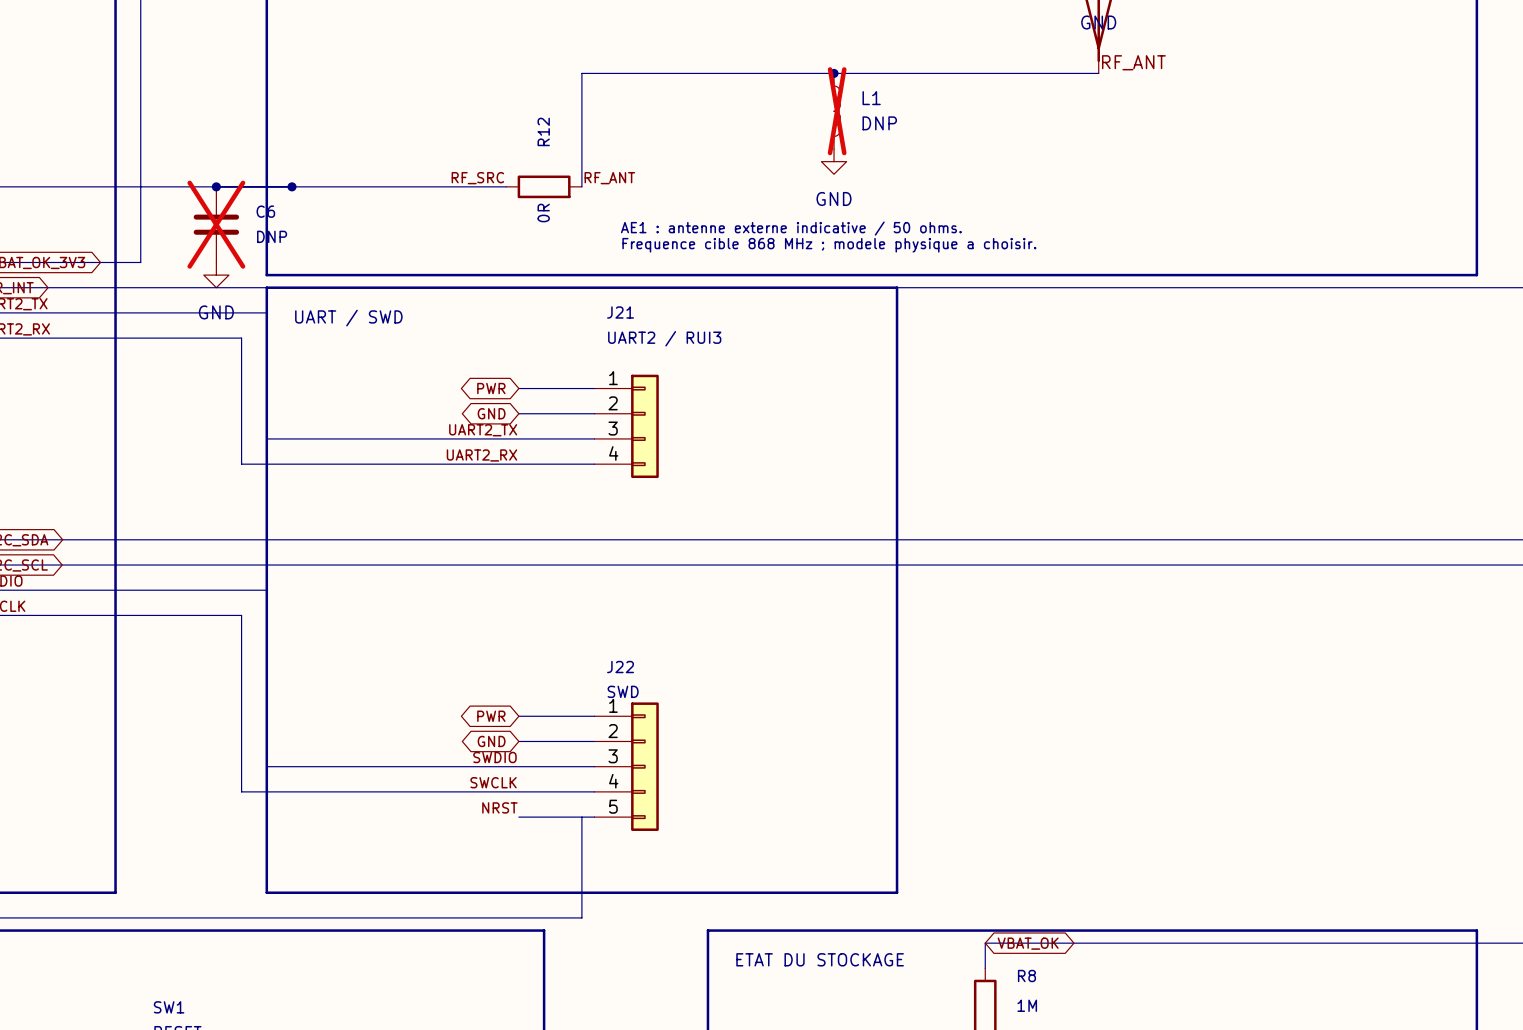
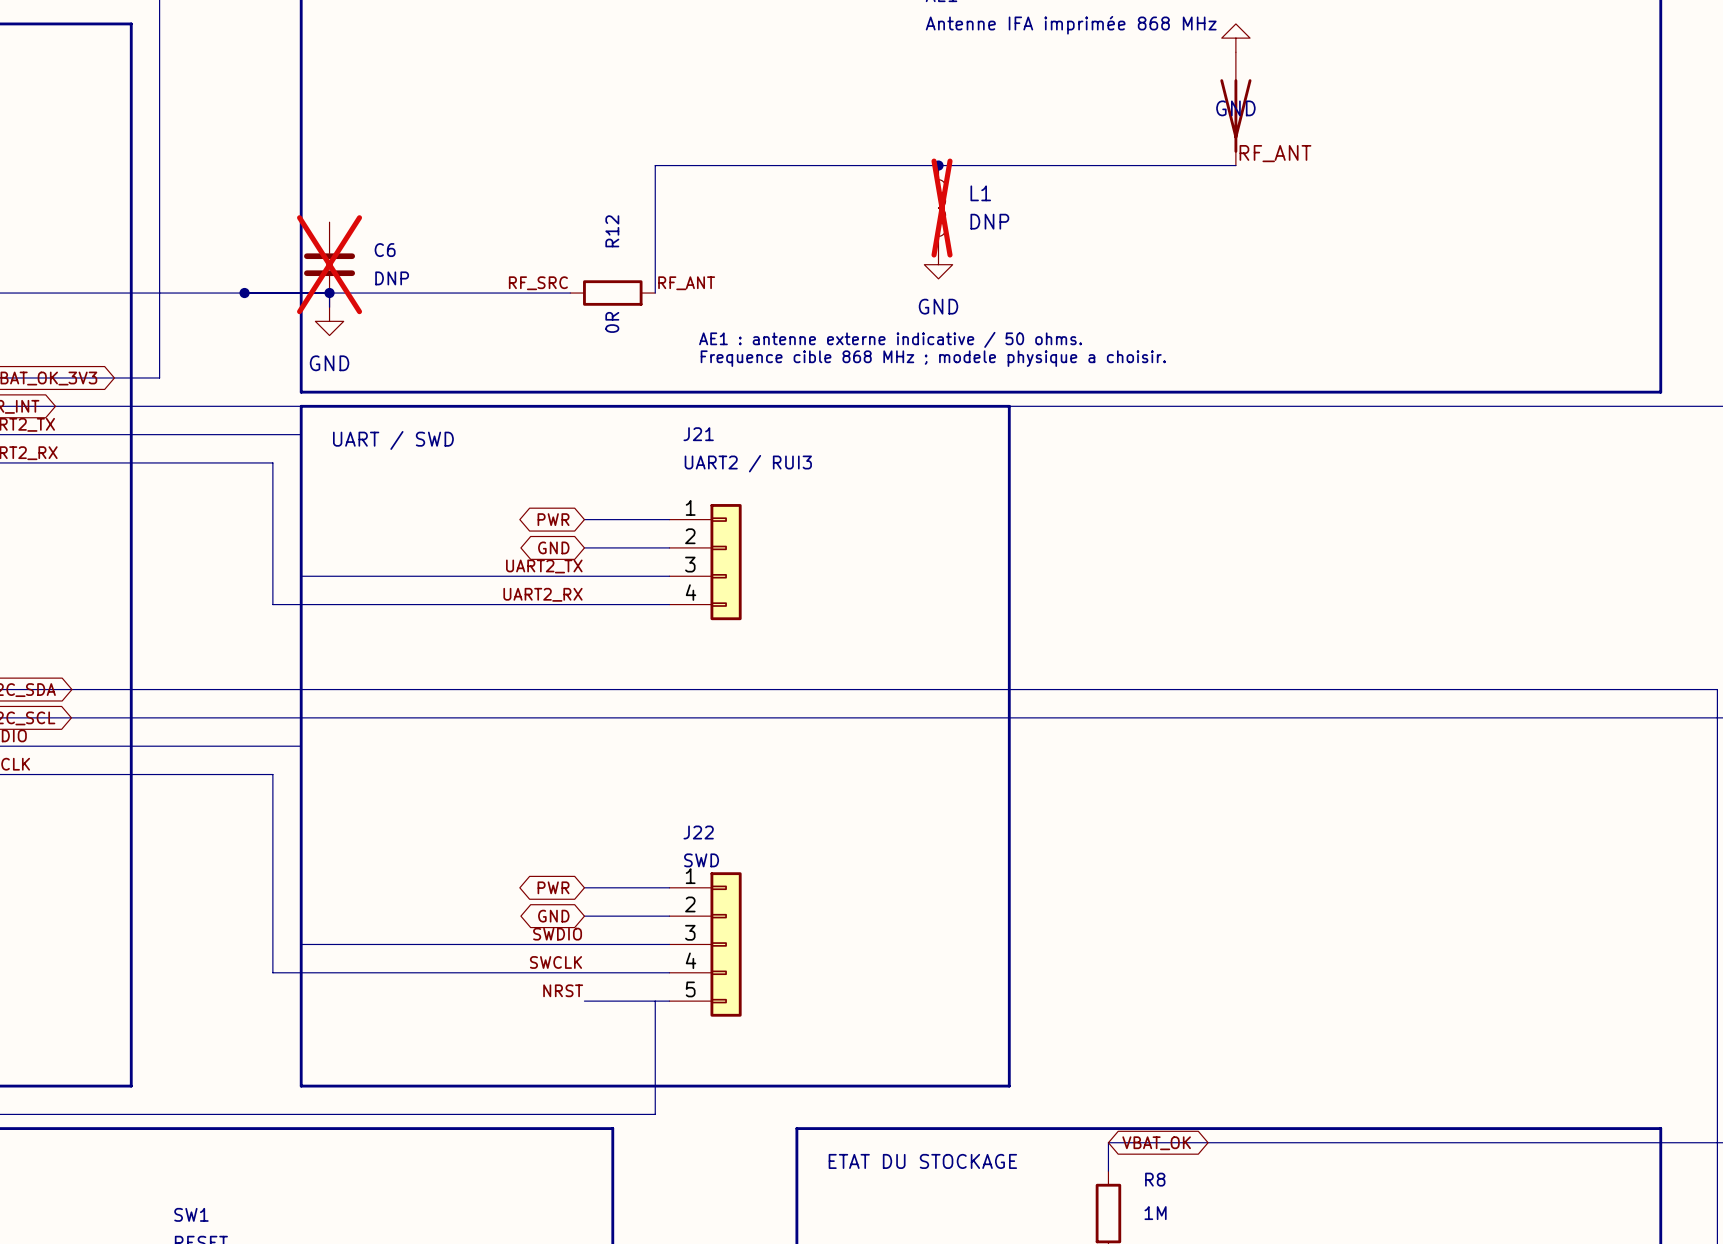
wire: none -> (329, 293) (329, 307)
C6 position: (216, 224) -> (329, 264)
power symbol position: GND (216, 275) -> GND (329, 321)

